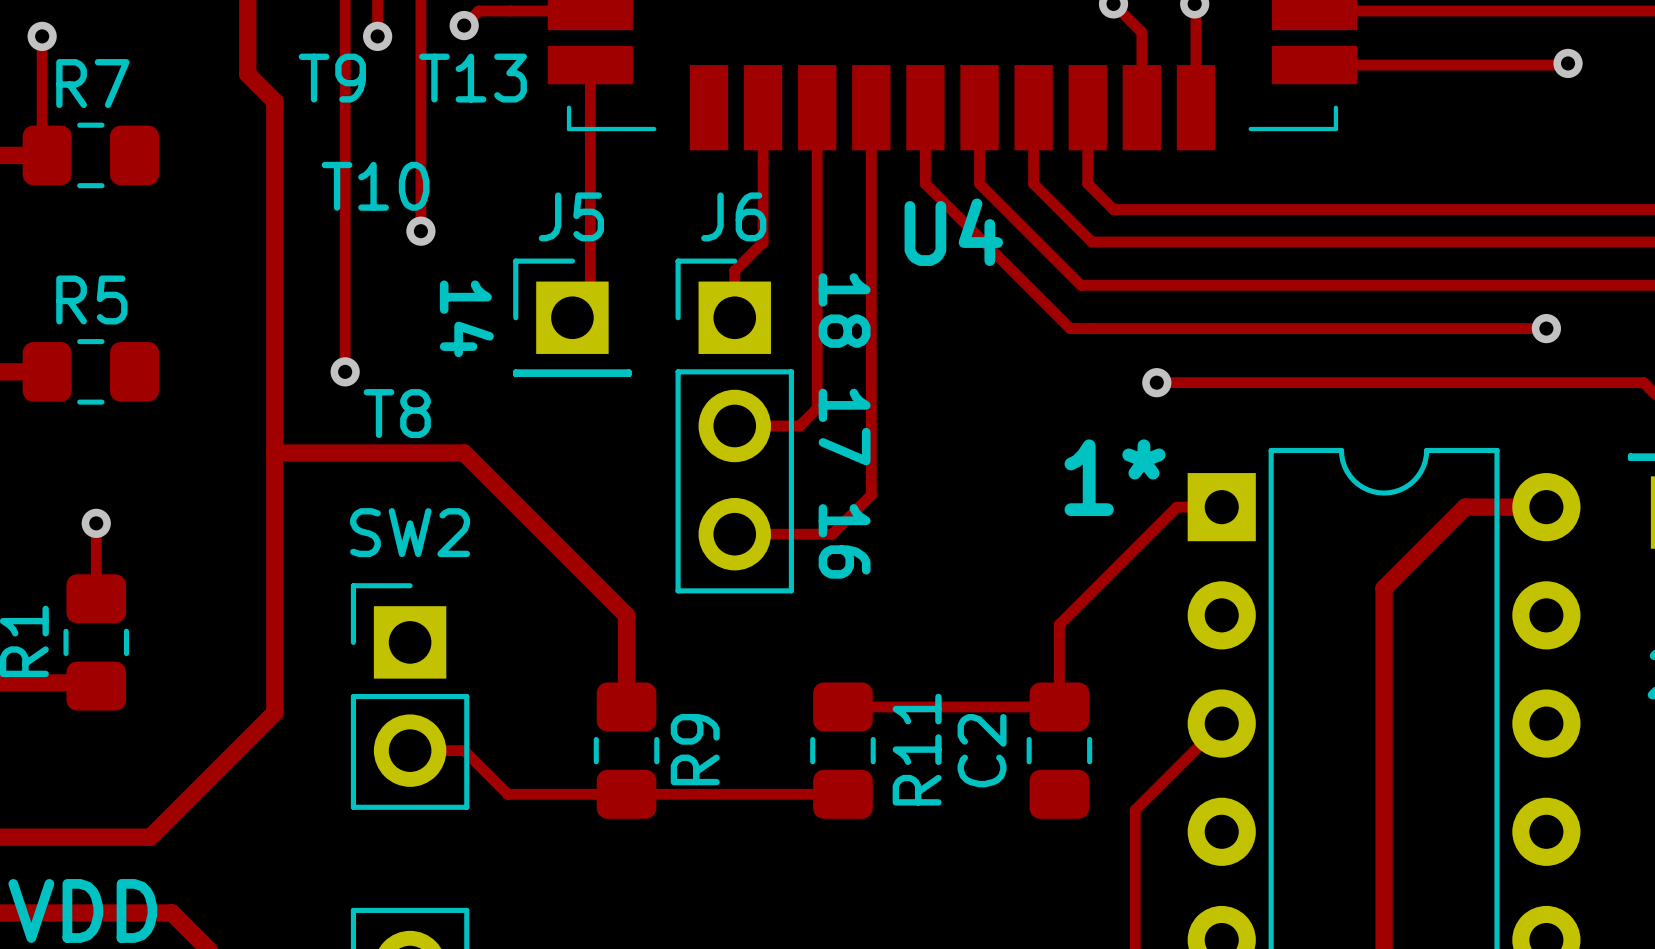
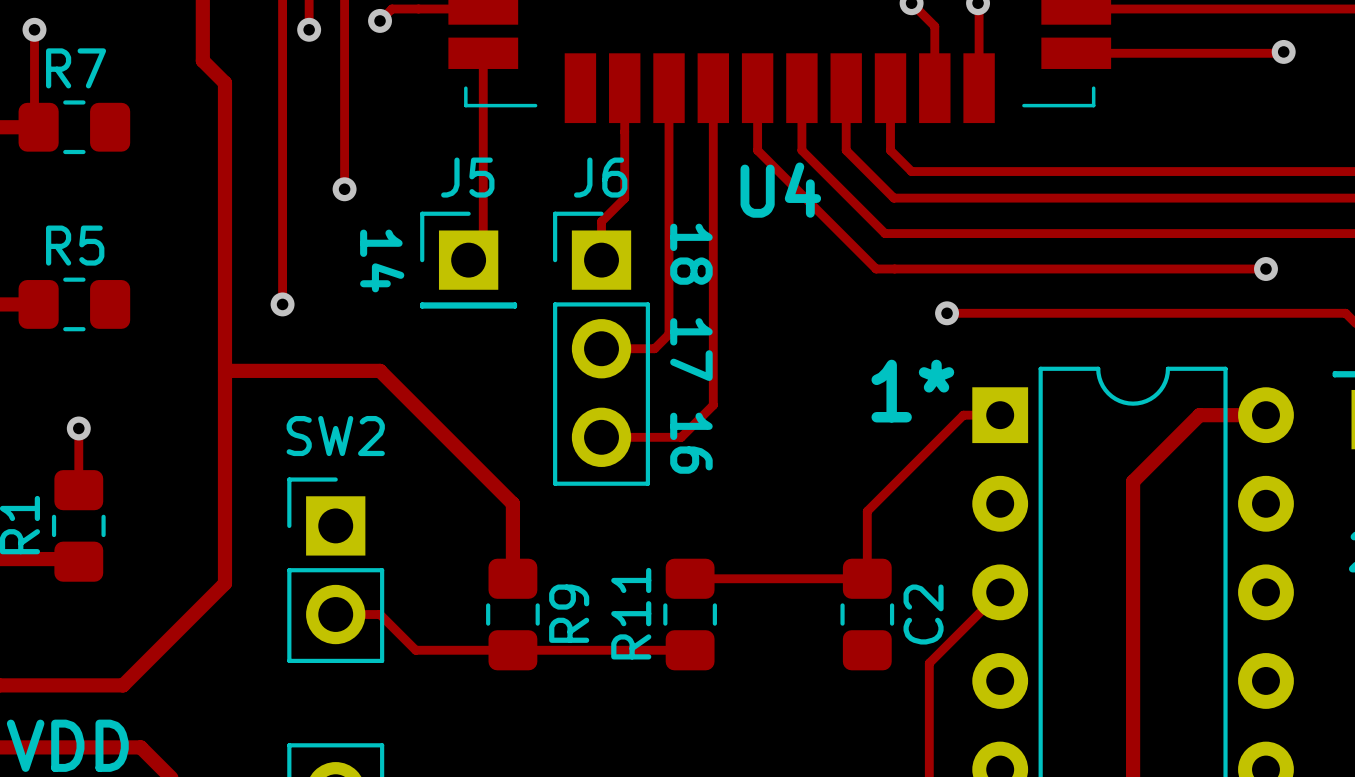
text: T9 (332, 78) -> none
text: T13 (472, 78) -> none
text: T10 (375, 186) -> none
text: T8 (397, 413) -> none
R11 name position: R11 (917, 749) -> R11 (631, 613)
C2 name position: C2 (982, 750) -> C2 (923, 614)

